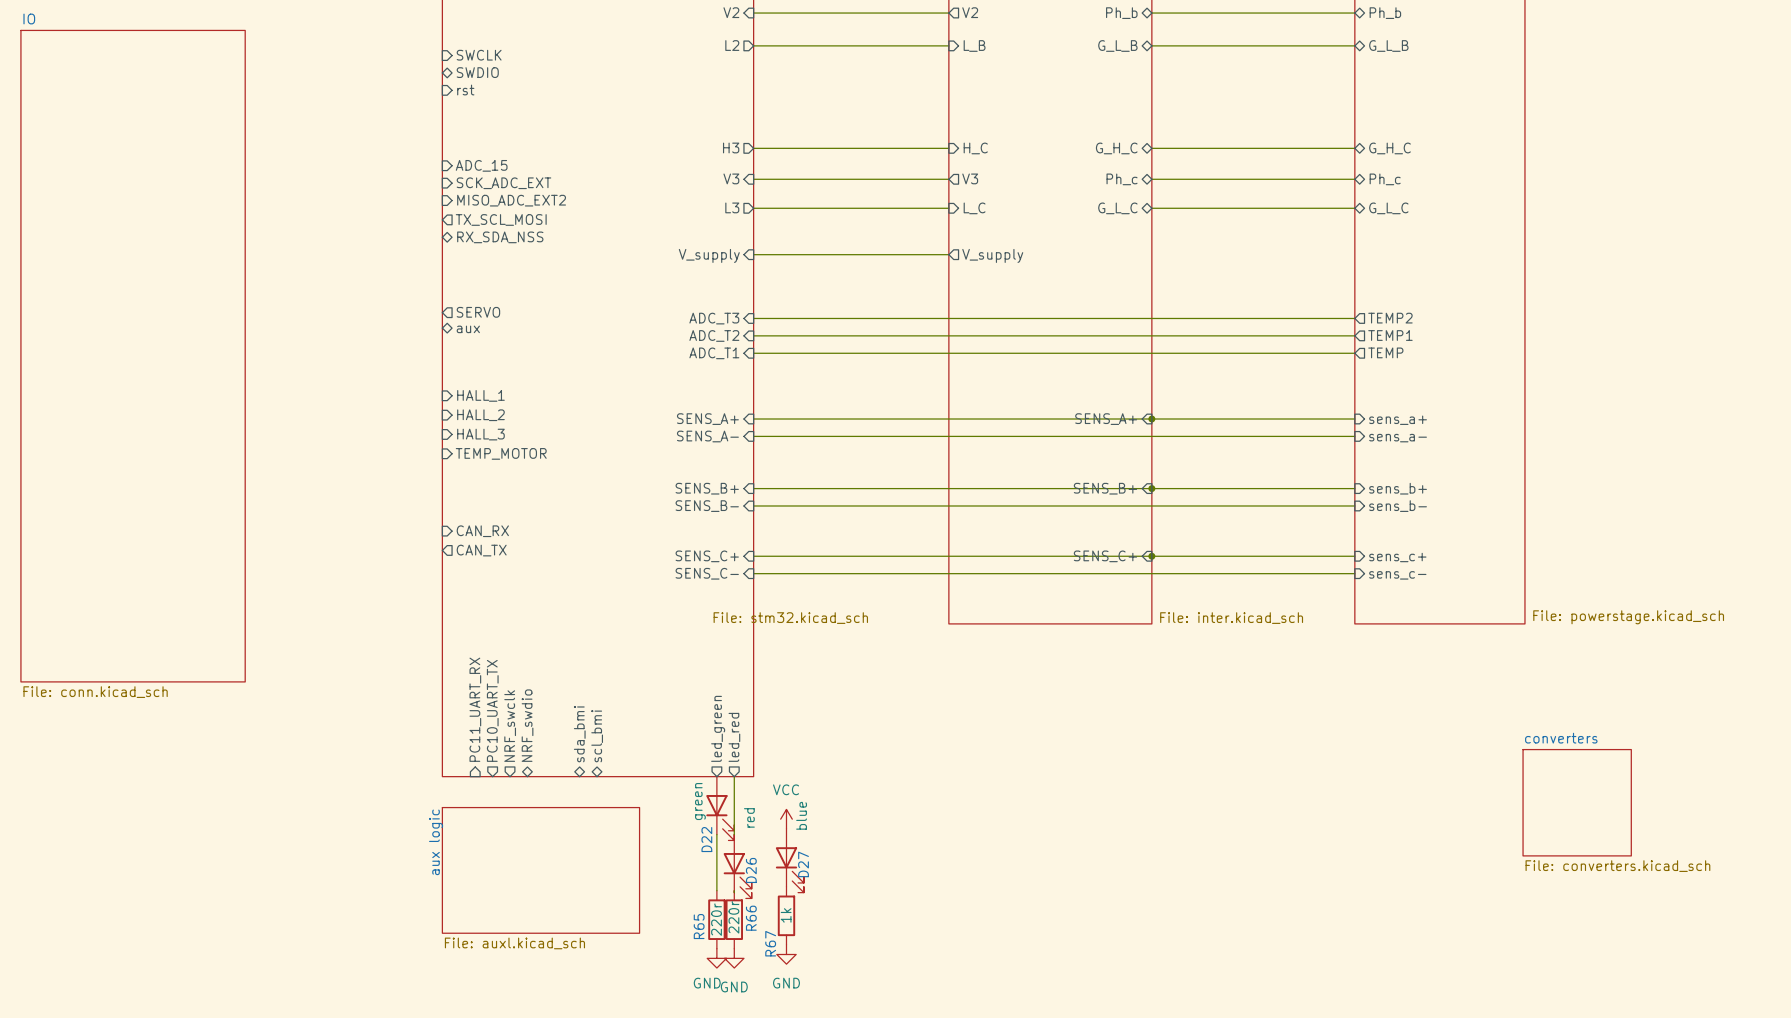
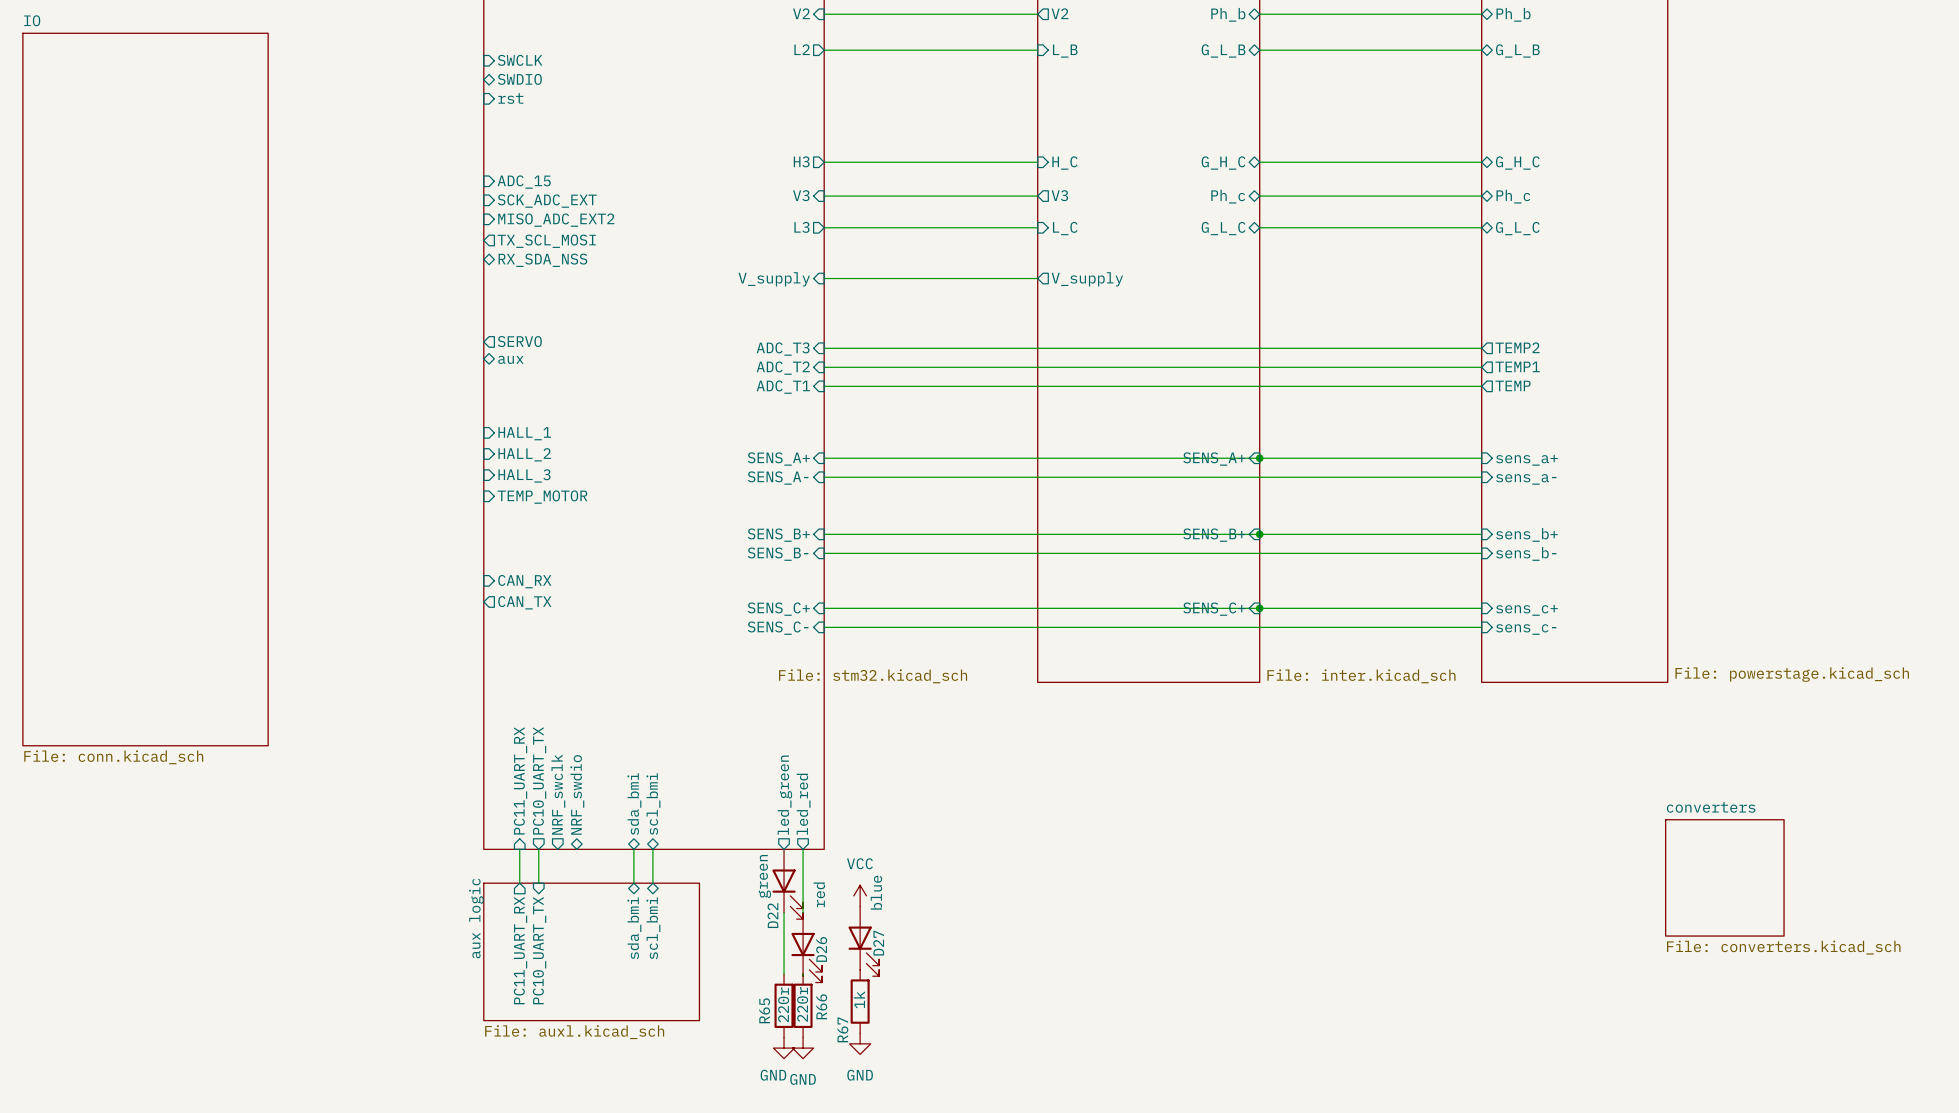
wire: none -> (519, 849) (519, 883)
wire: none -> (538, 849) (538, 883)
wire: none -> (633, 849) (633, 883)
wire: none -> (652, 849) (652, 883)
sheet pin: none -> scl_bmi (653, 928)
sheet pin: none -> sda_bmi (634, 928)
sheet pin: none -> PC10_UART_TX (539, 950)
sheet pin: none -> PC11_UART_RX (520, 950)

